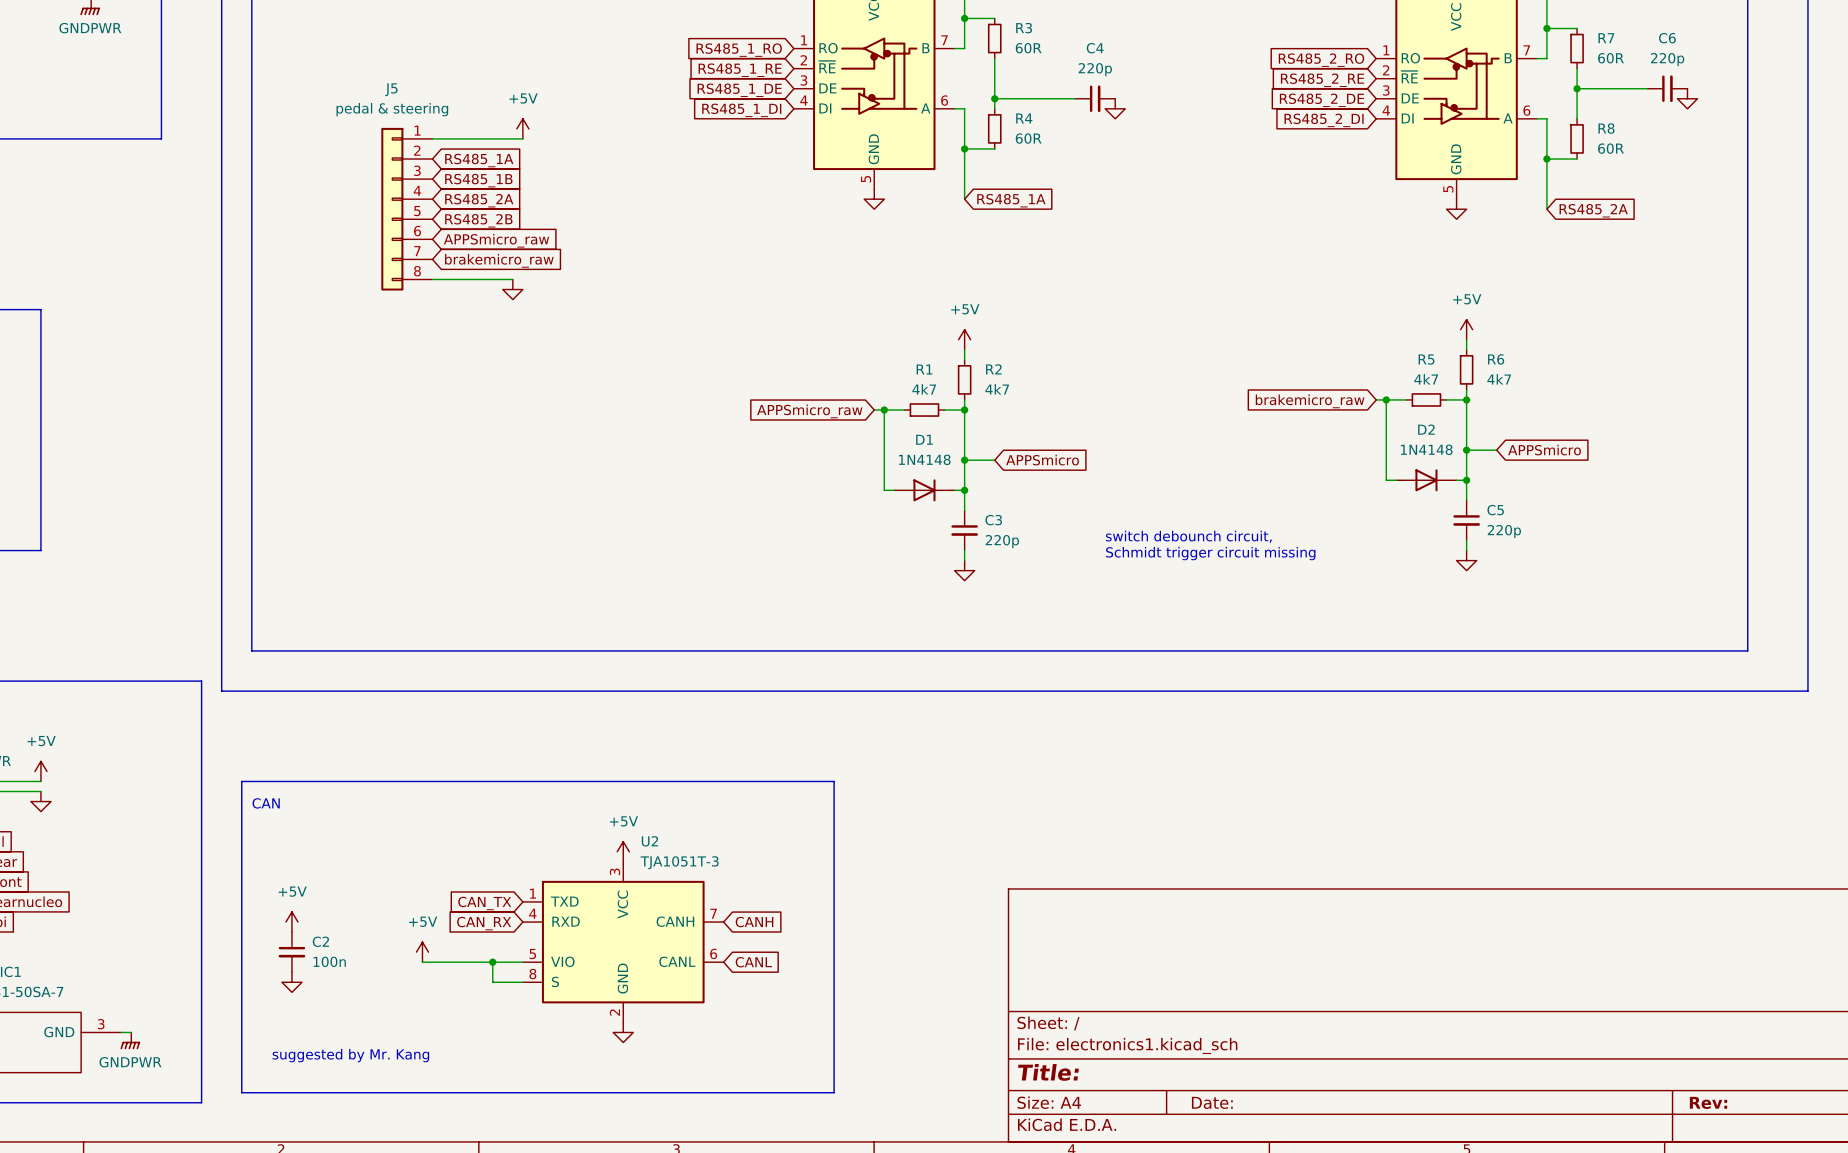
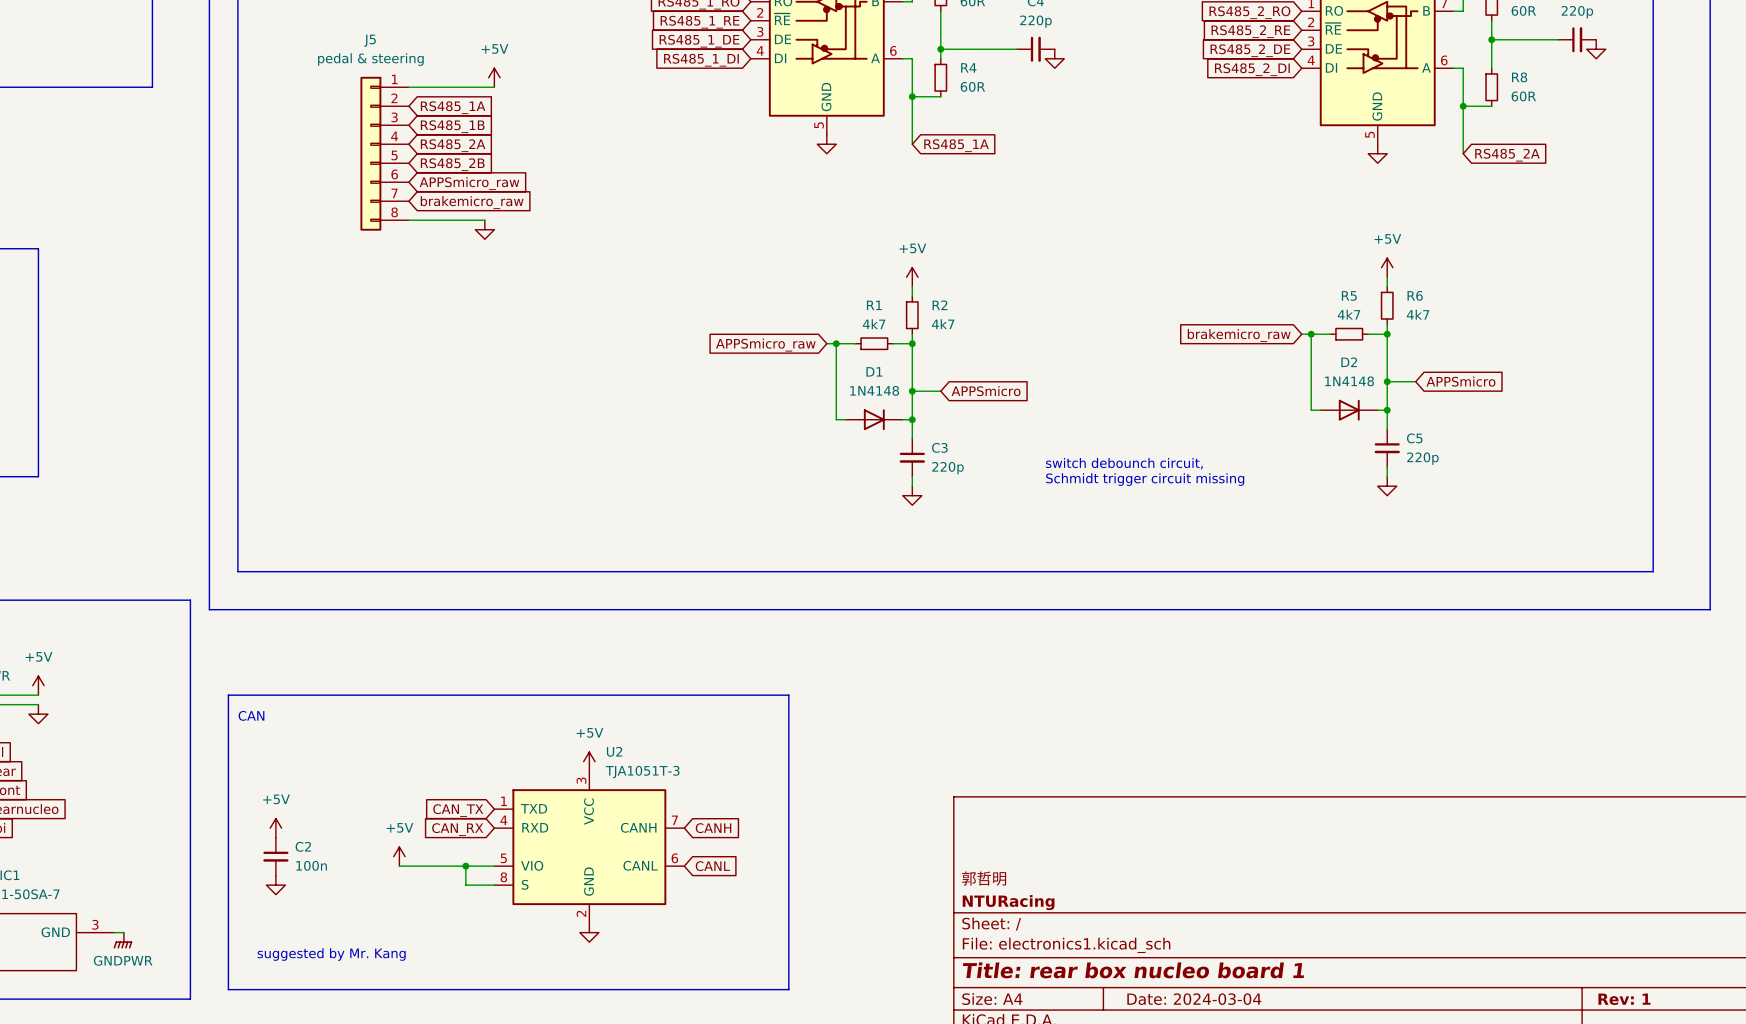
title block: none -> 郭哲明 (984, 878)
title block: none -> NTURacing (1008, 902)
title block: Title: (1048, 1072) -> Title: rear box nucleo board 1 (1133, 970)
title block: Date: (1212, 1102) -> Date: 2024-03-04 (1194, 999)
title block: Rev: (1708, 1102) -> Rev: 1 (1624, 999)

